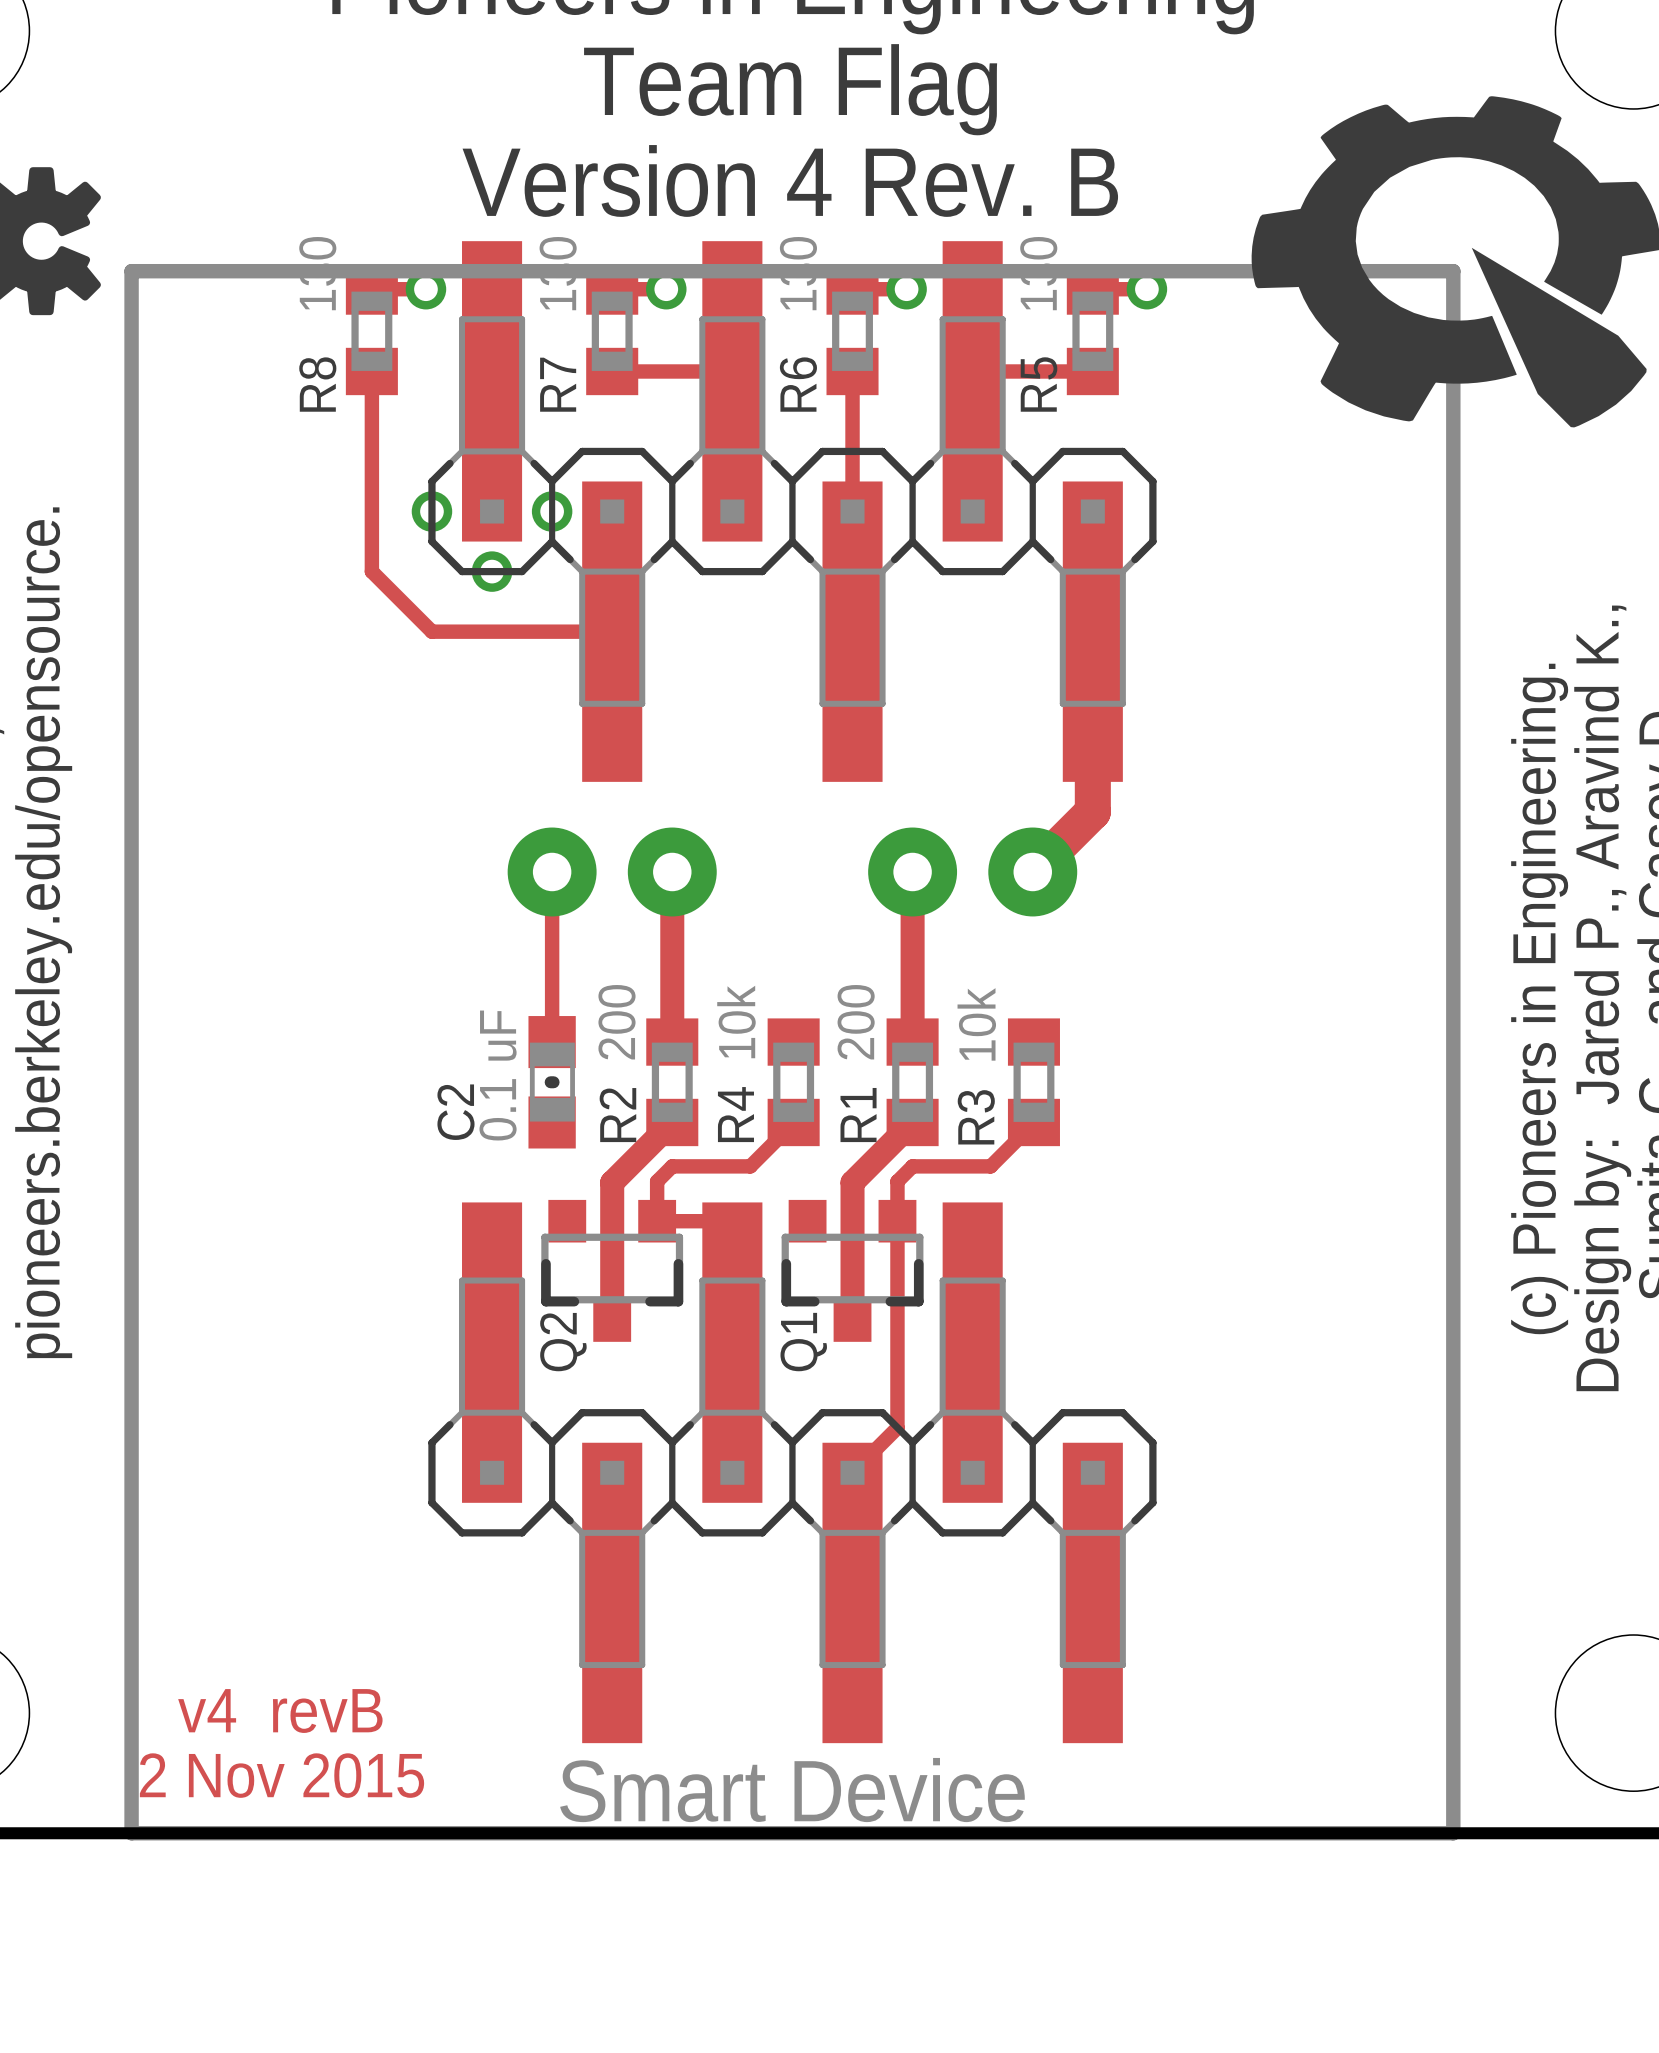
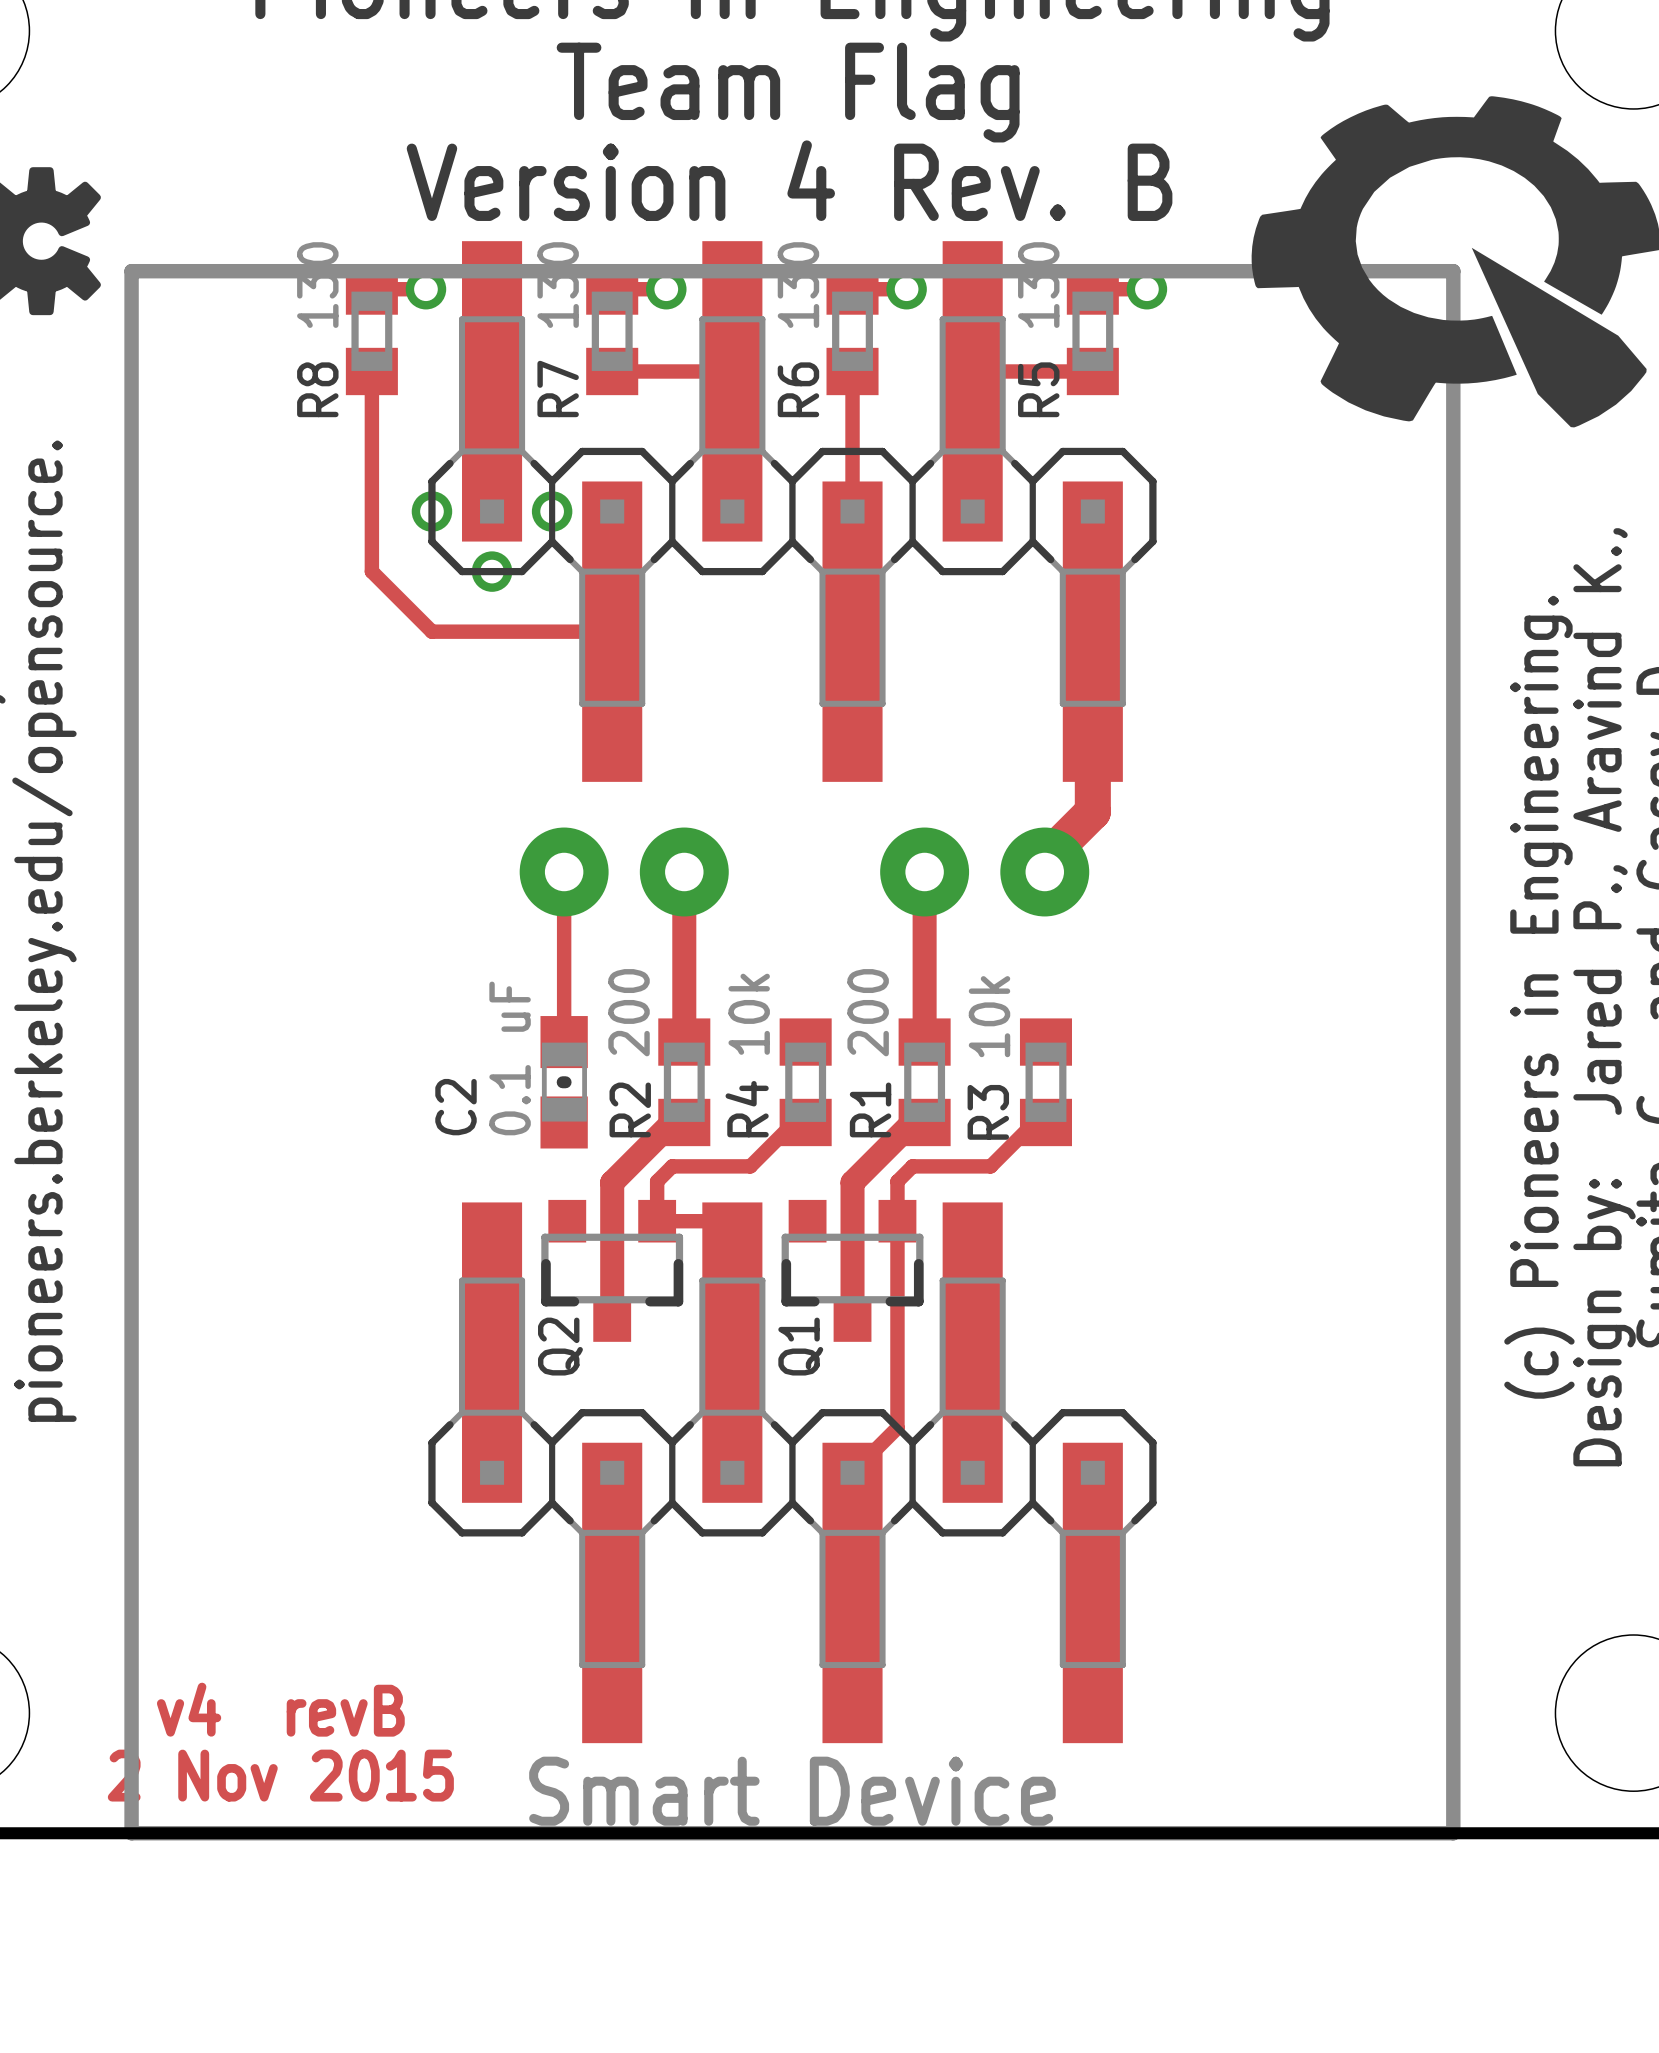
track: (552, 871) (552, 1042) -> (564, 871) (564, 1042)
part position: (612, 871) -> (624, 871)
track: (672, 871) (672, 1042) -> (684, 871) (684, 1042)
track: (912, 871) (912, 1042) -> (924, 871) (924, 1042)
part position: (972, 871) -> (984, 871)
C2 position: (552, 1082) -> (564, 1082)
R2 position: (672, 1082) -> (684, 1082)
R4 position: (793, 1082) -> (805, 1082)
R1 position: (912, 1082) -> (924, 1082)
R3 position: (1033, 1082) -> (1045, 1082)

